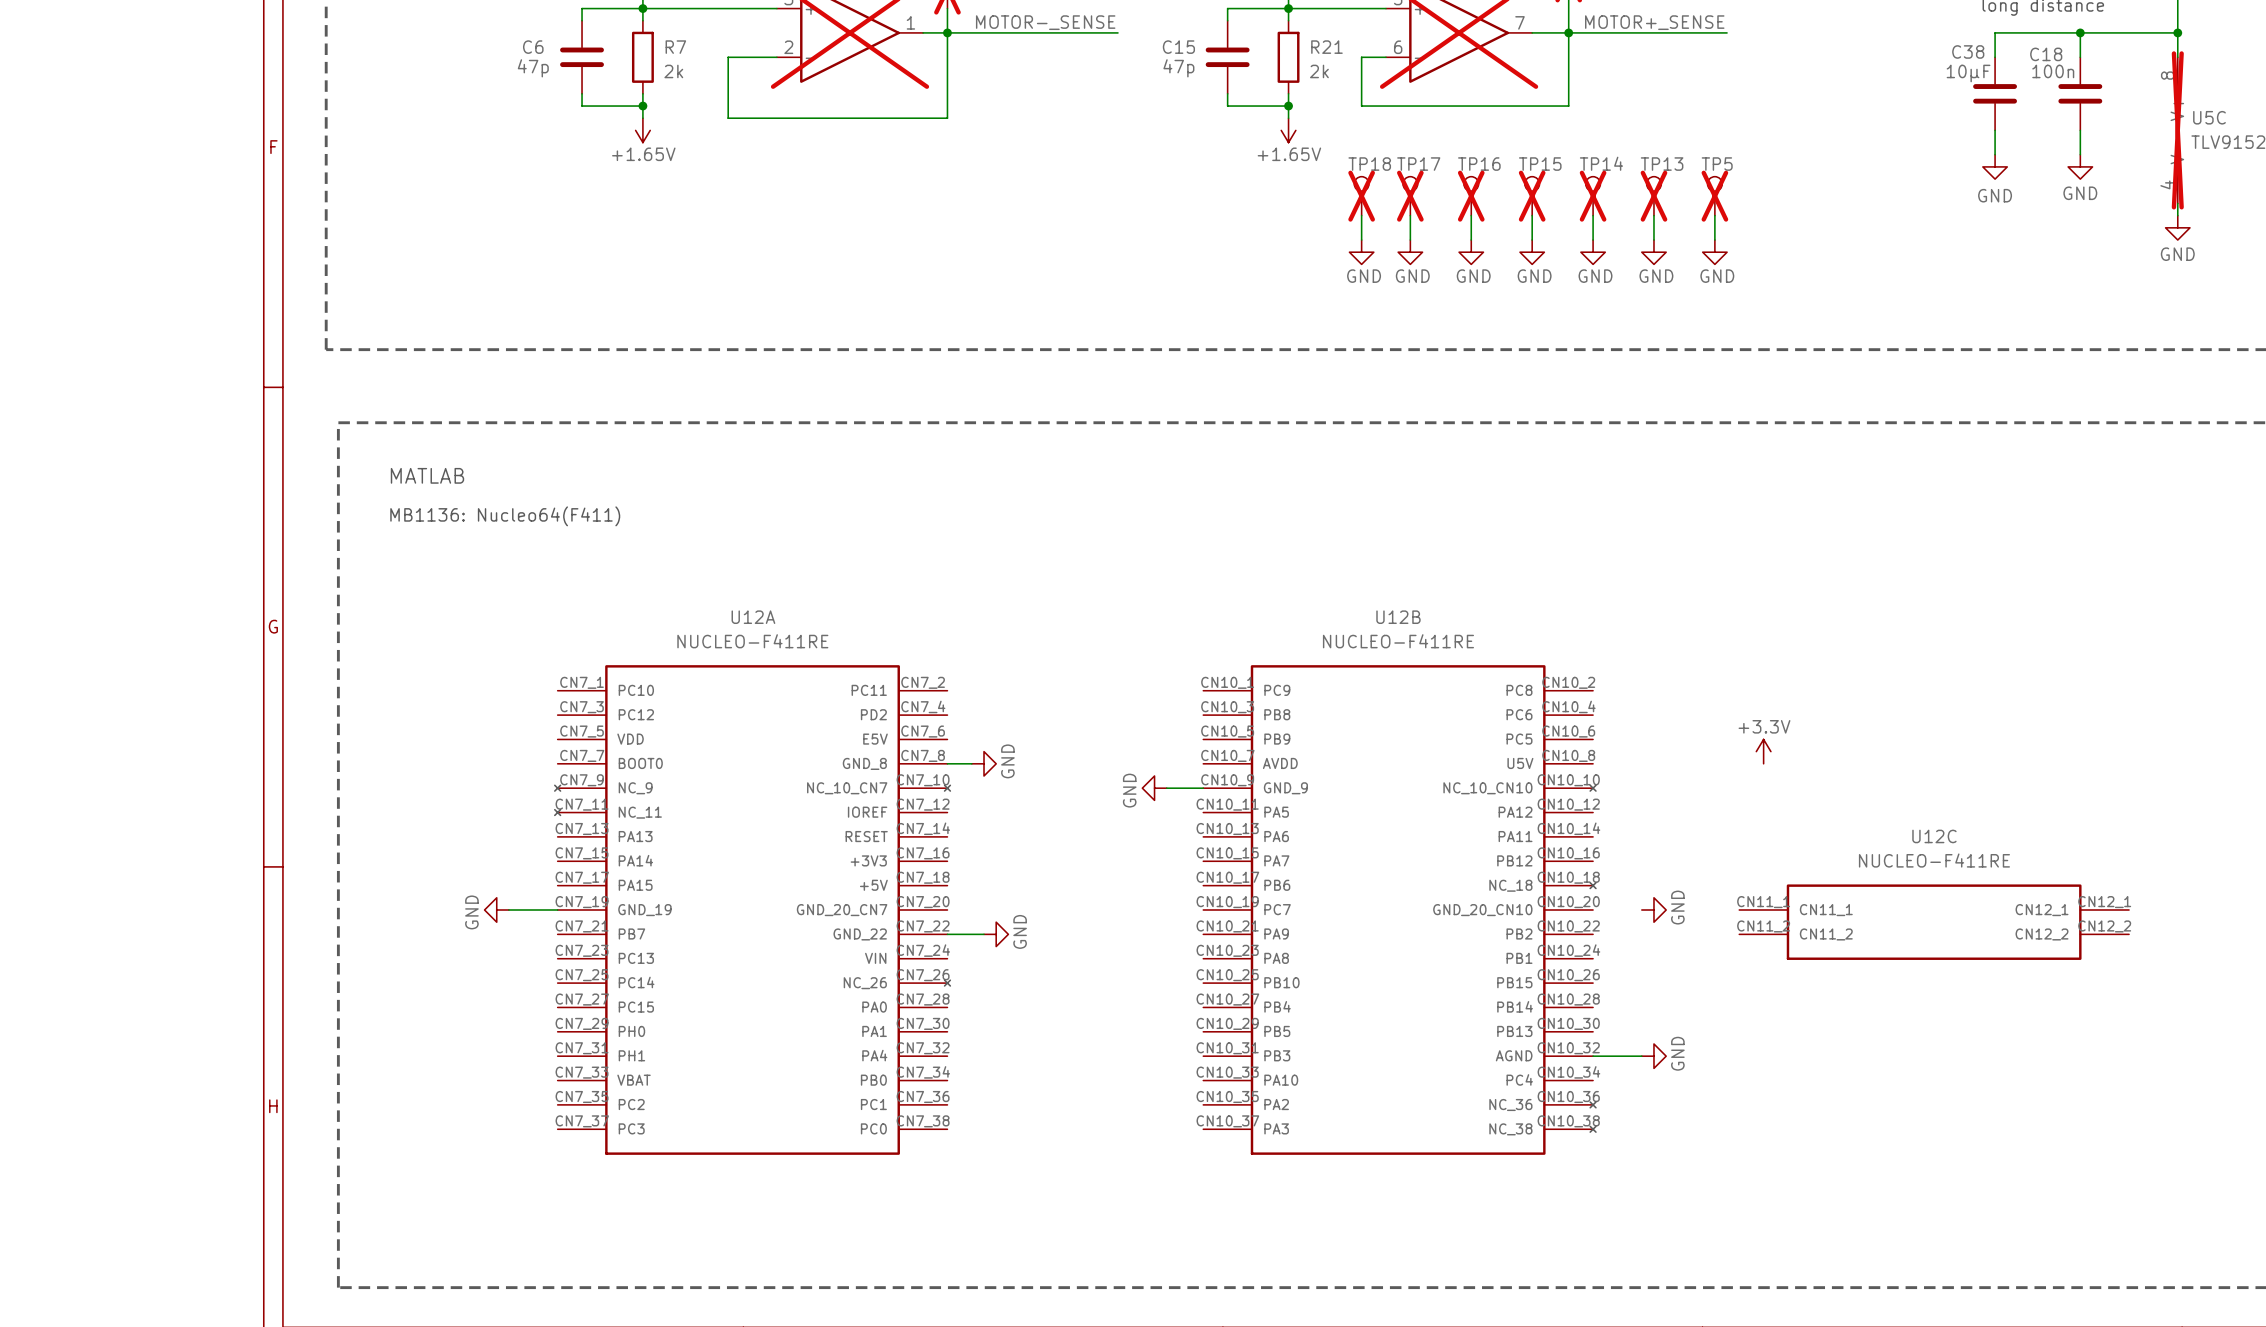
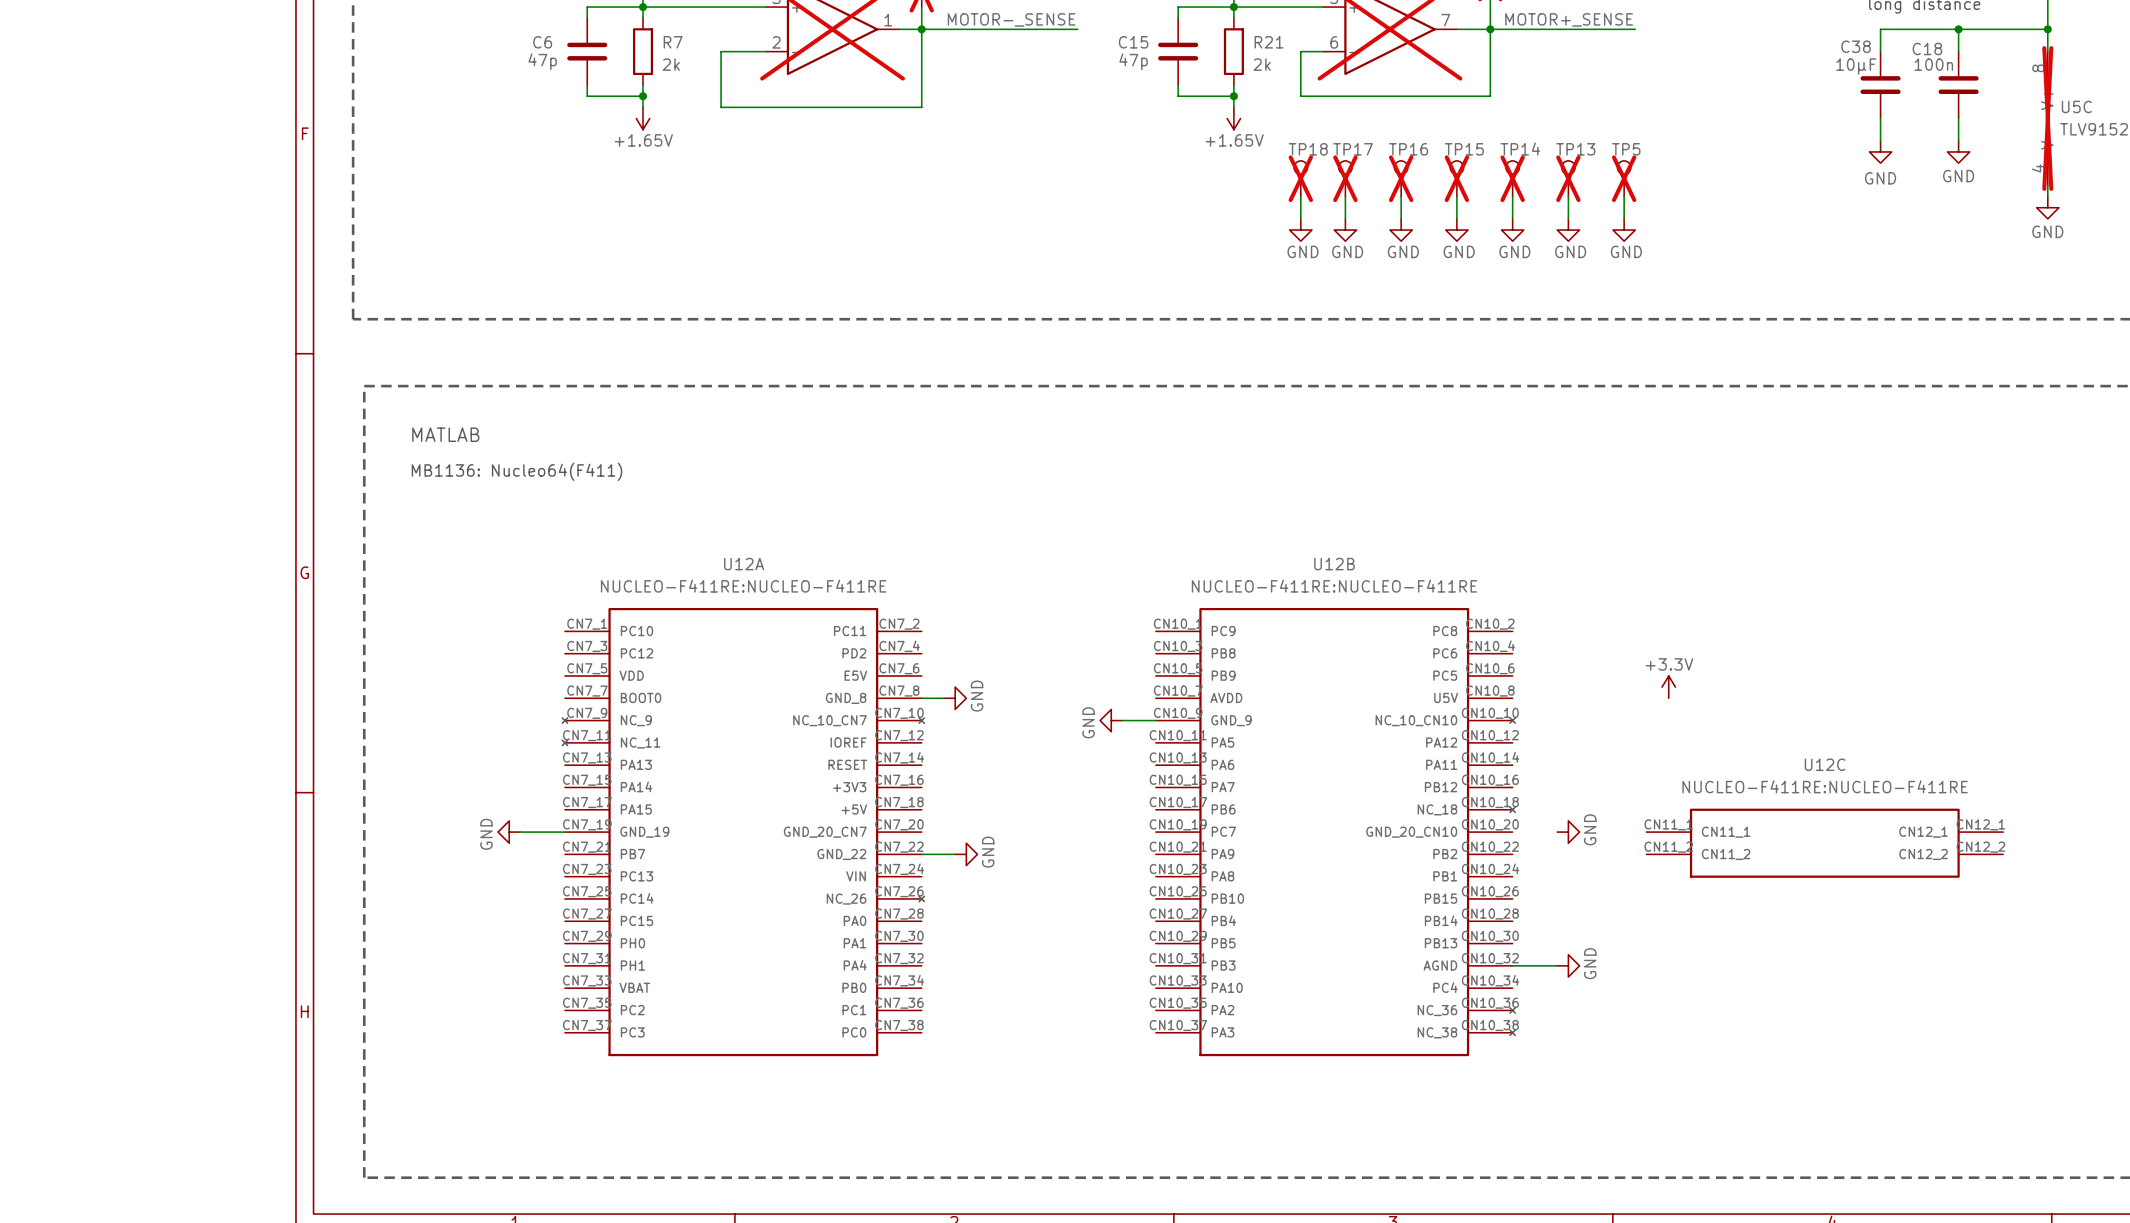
U12A value: NUCLEO-F411RE (752, 641) -> NUCLEO-F411RE:NUCLEO-F411RE (743, 586)
U12B value: NUCLEO-F411RE (1398, 641) -> NUCLEO-F411RE:NUCLEO-F411RE (1334, 586)
U12C value: NUCLEO-F411RE (1934, 860) -> NUCLEO-F411RE:NUCLEO-F411RE (1825, 786)

